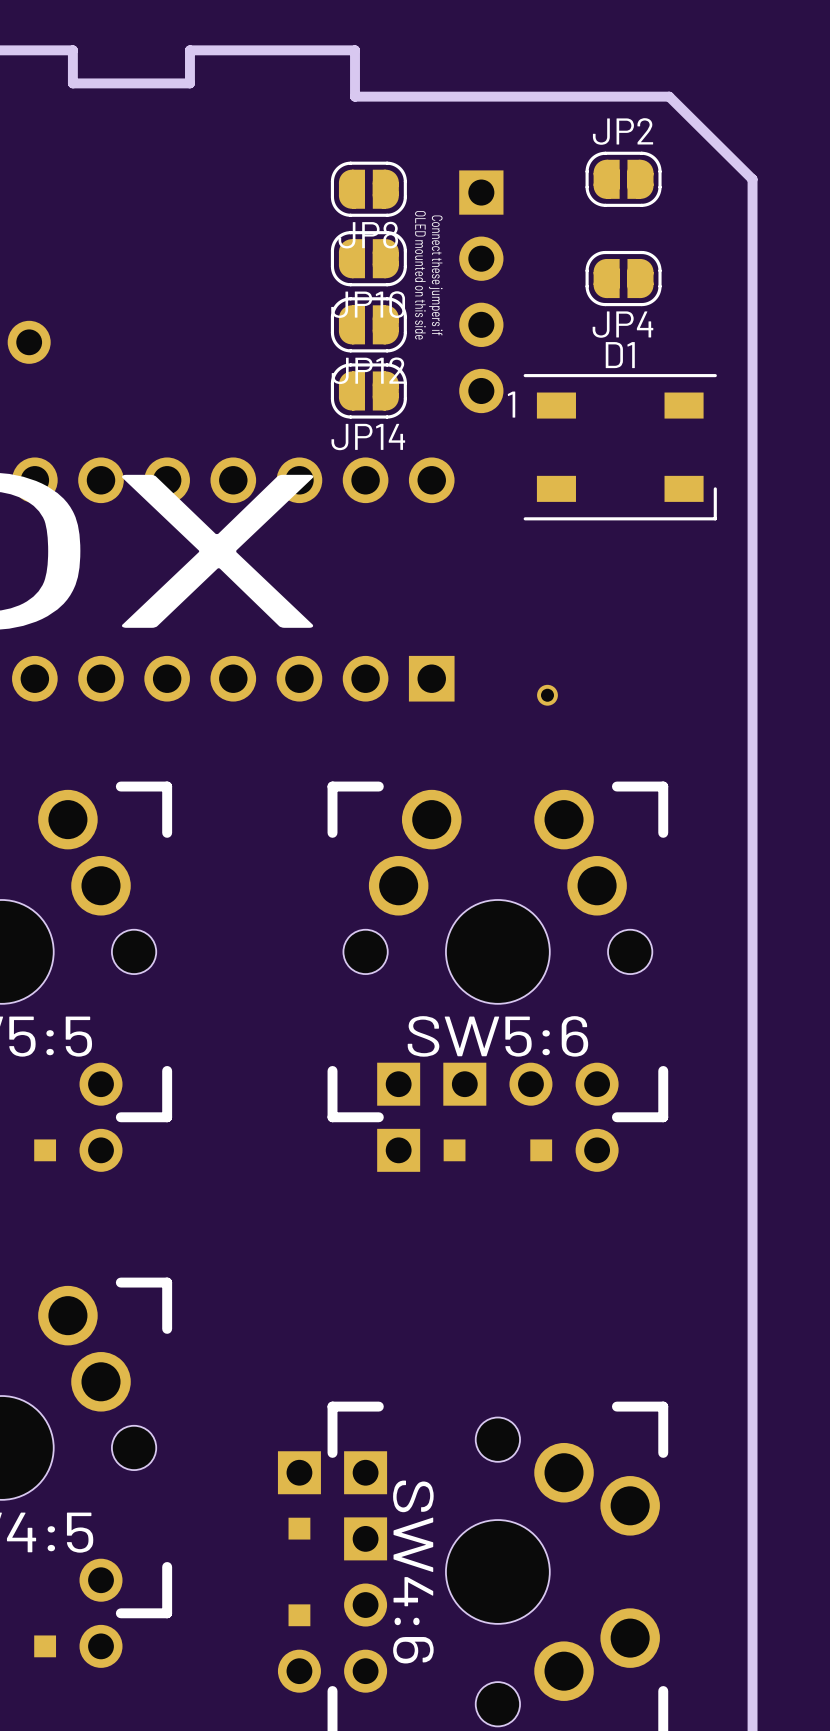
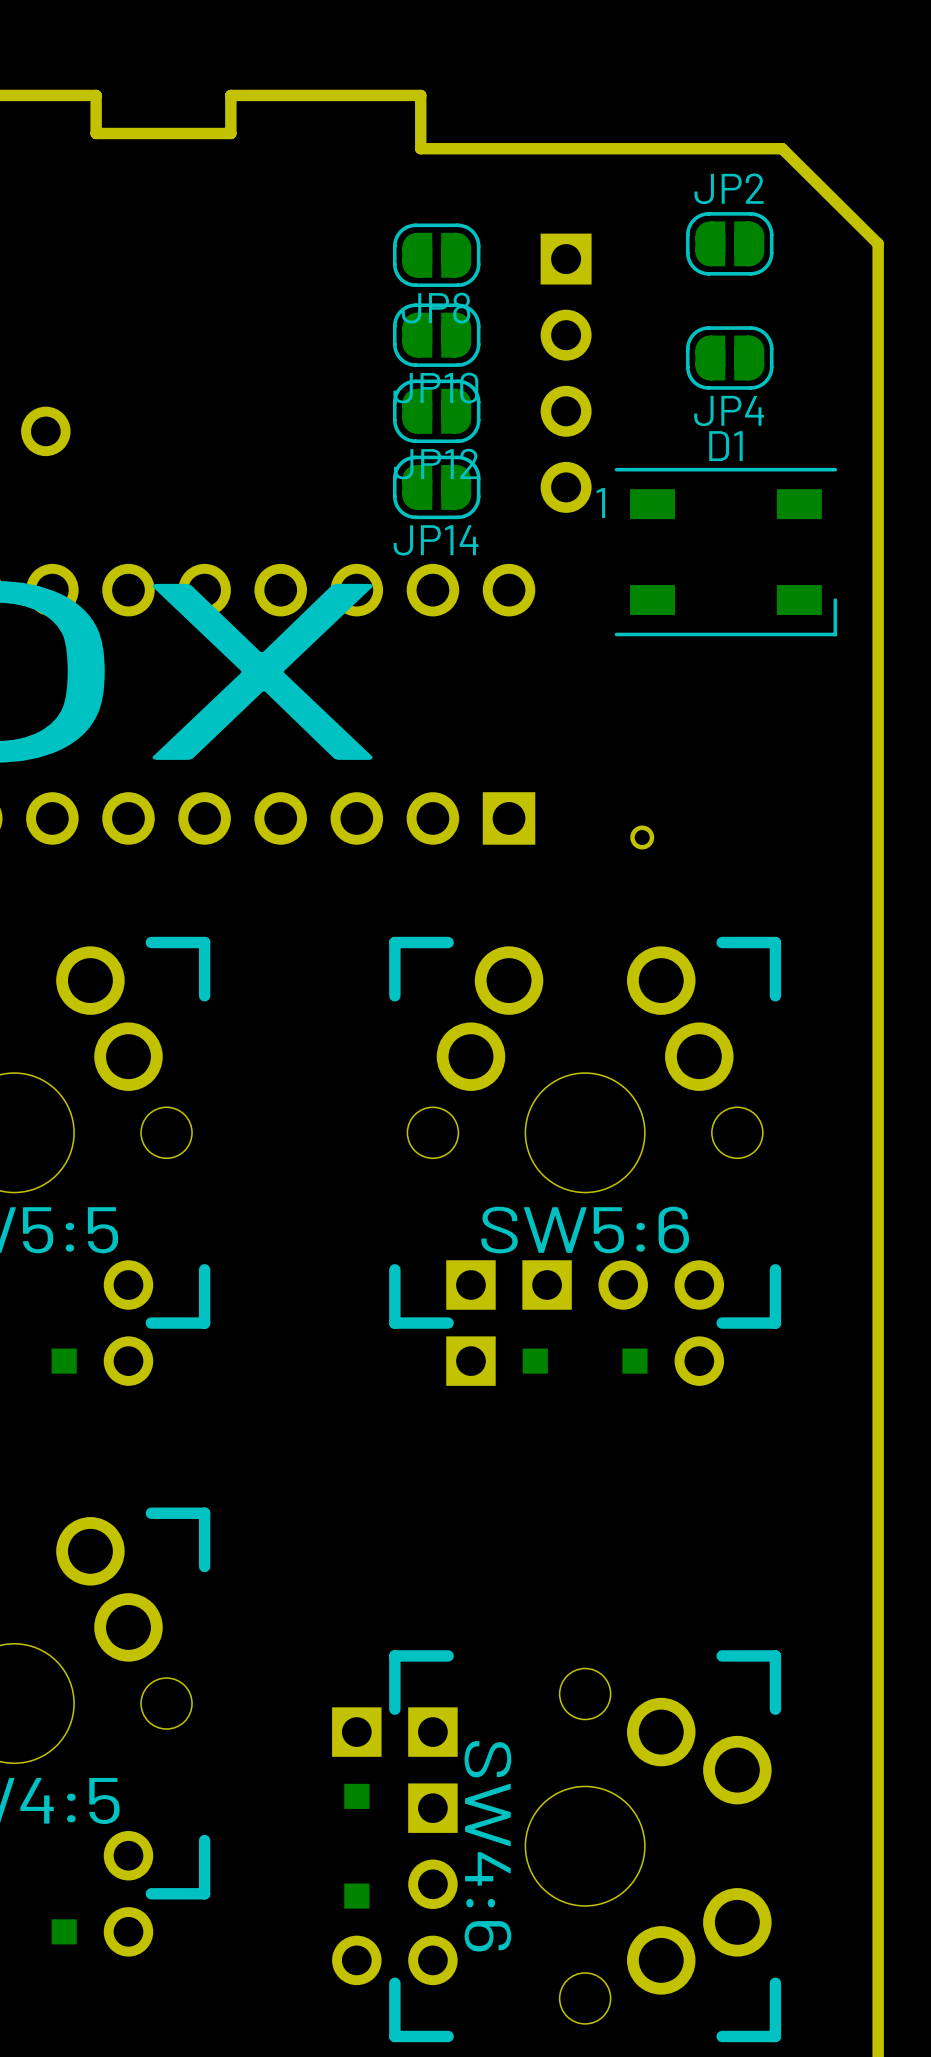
text: OLED mounted on this side (420, 275) -> none
text: Connect these jumpers if (435, 275) -> none

